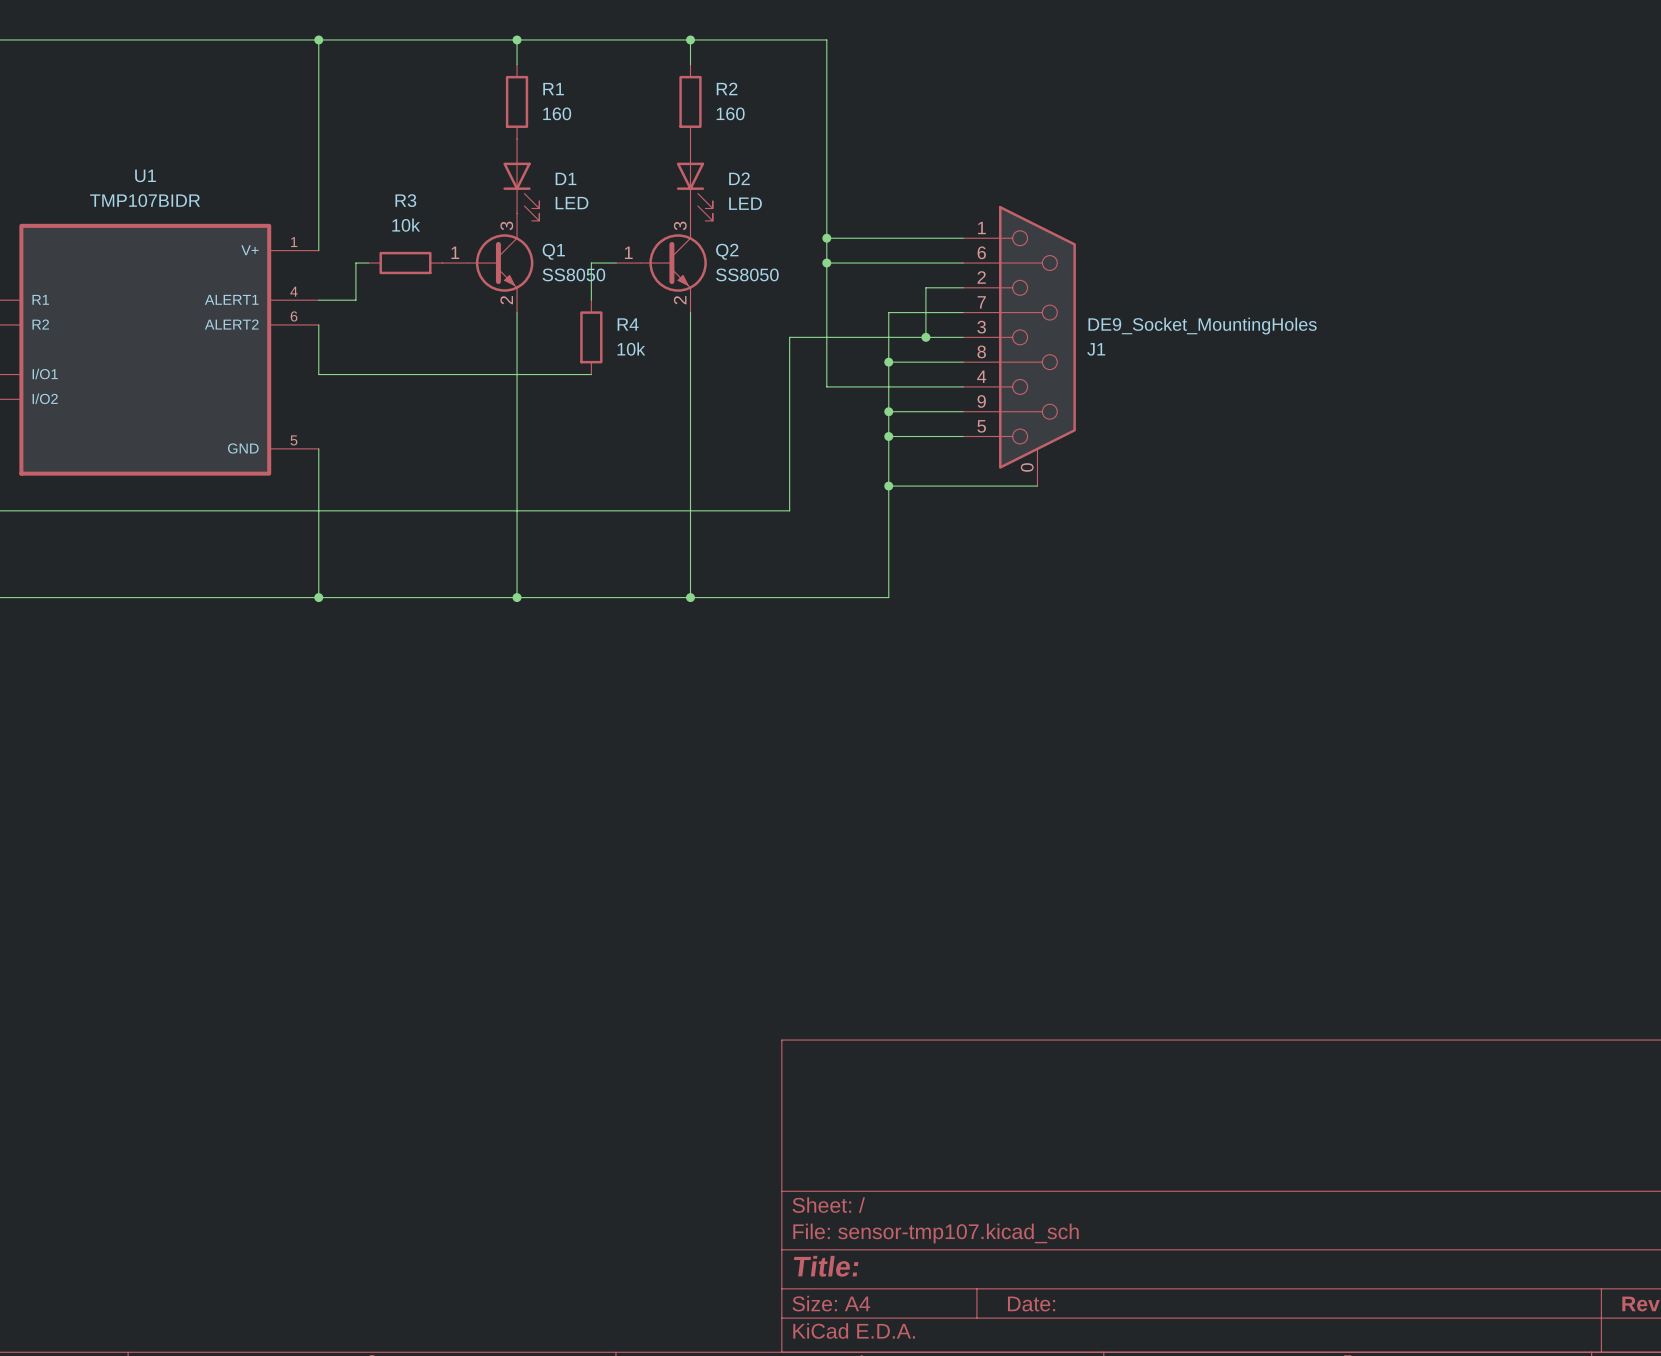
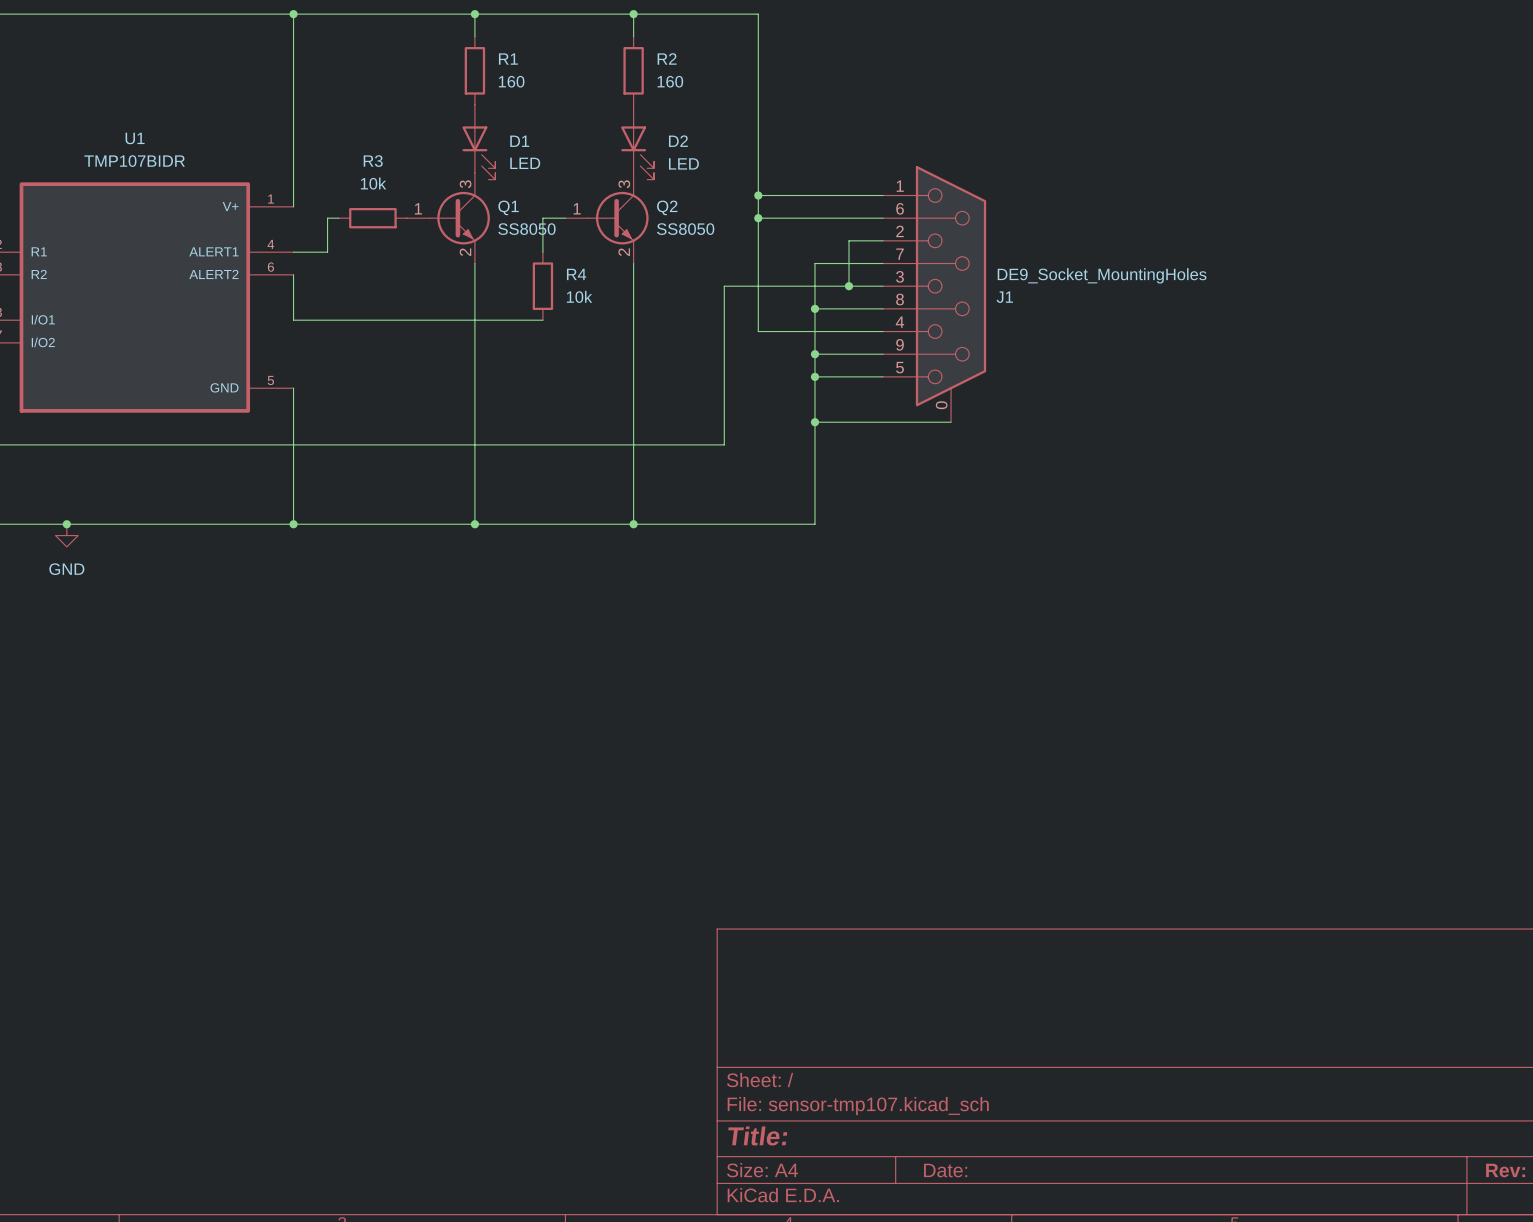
junction: none -> (66, 524)
power symbol: none -> GND (66, 535)

